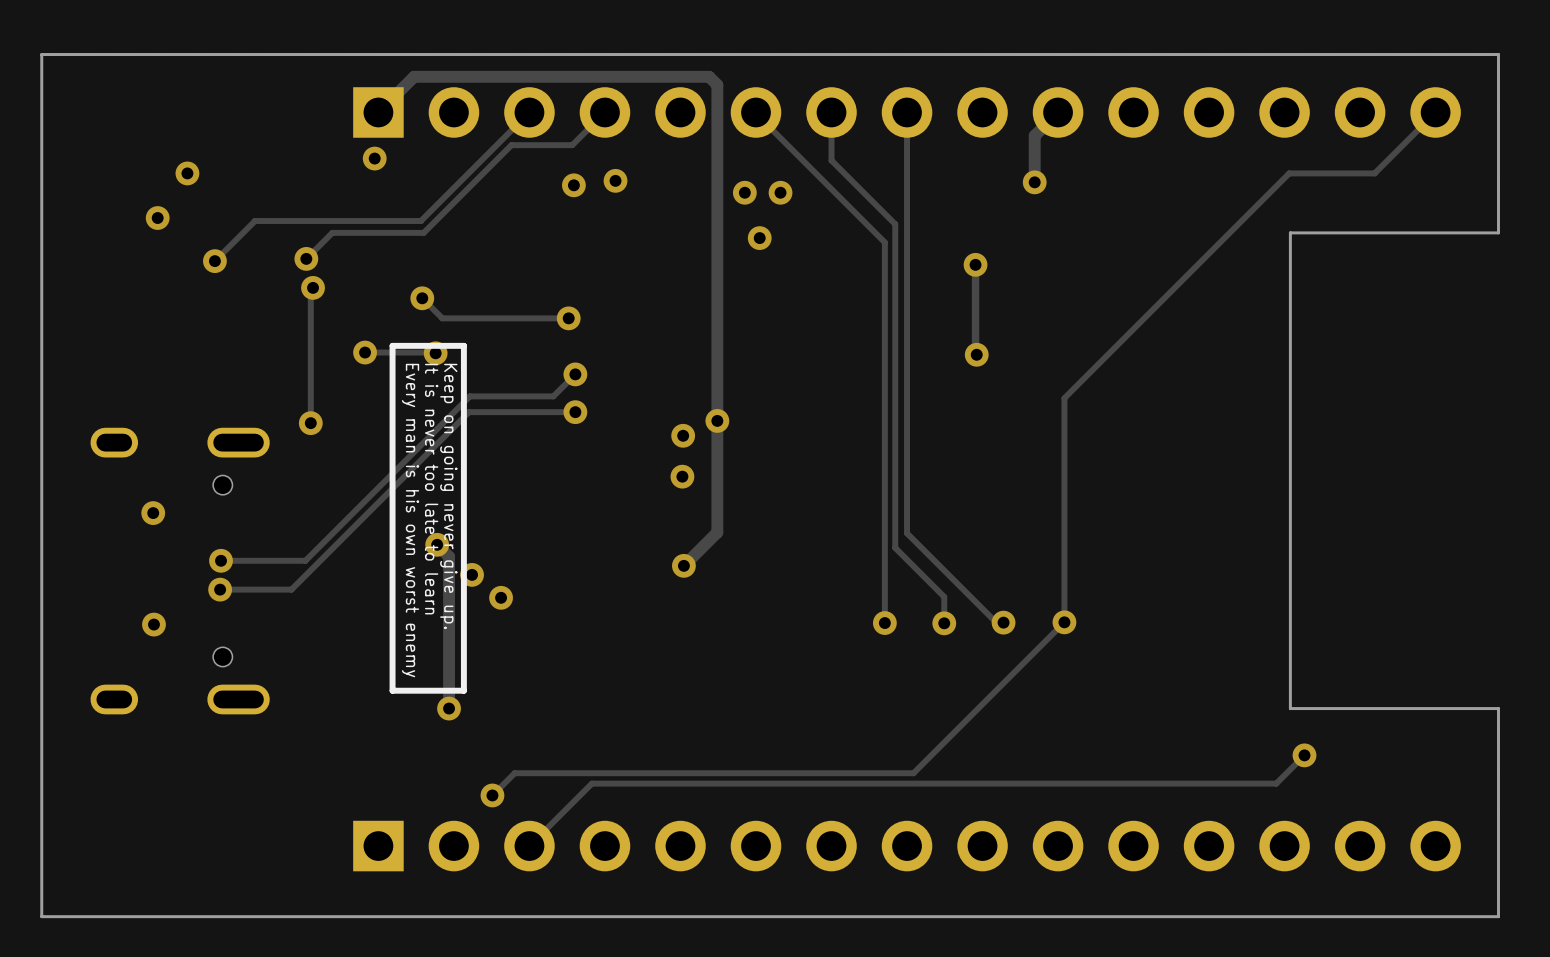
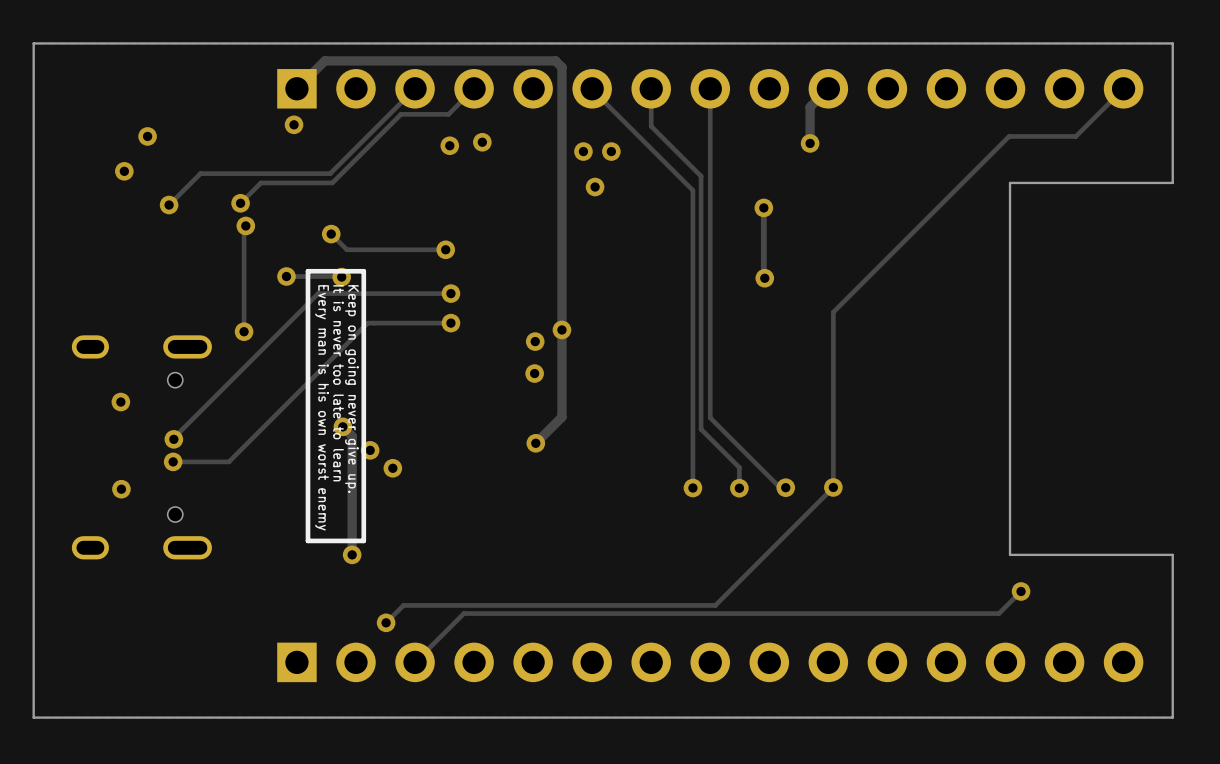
track: (575, 374) (553, 396) (469, 396) (305, 560) (221, 560) -> (450, 293) (318, 293) (173, 439)

